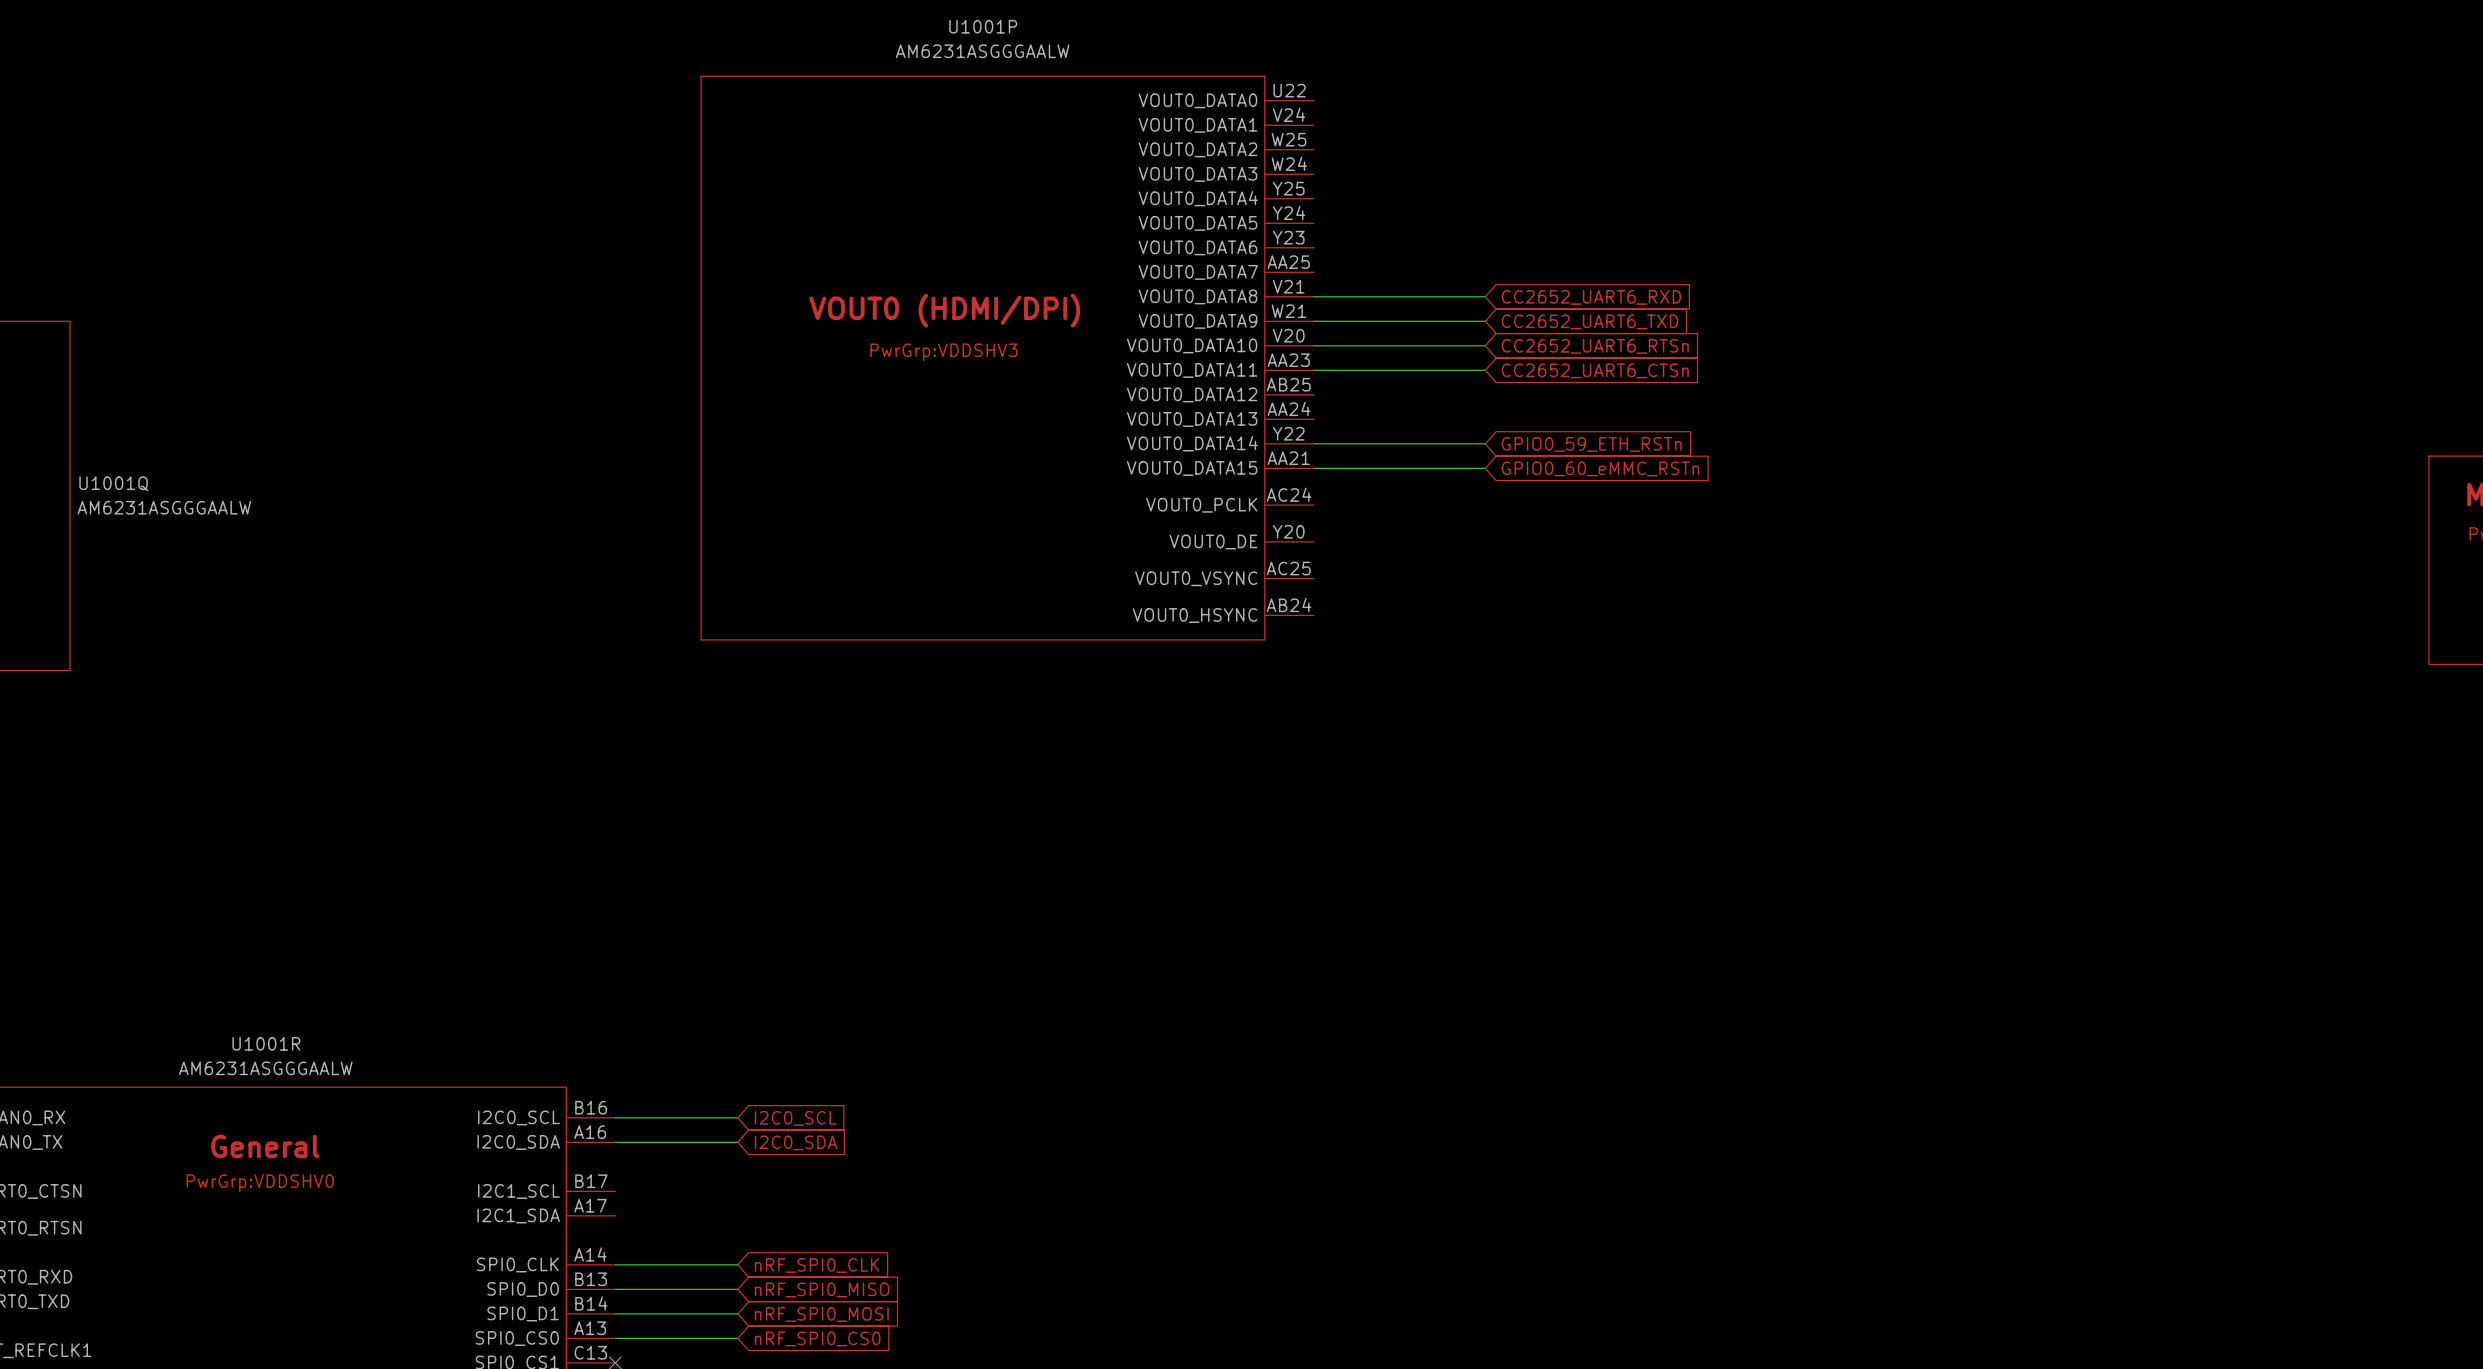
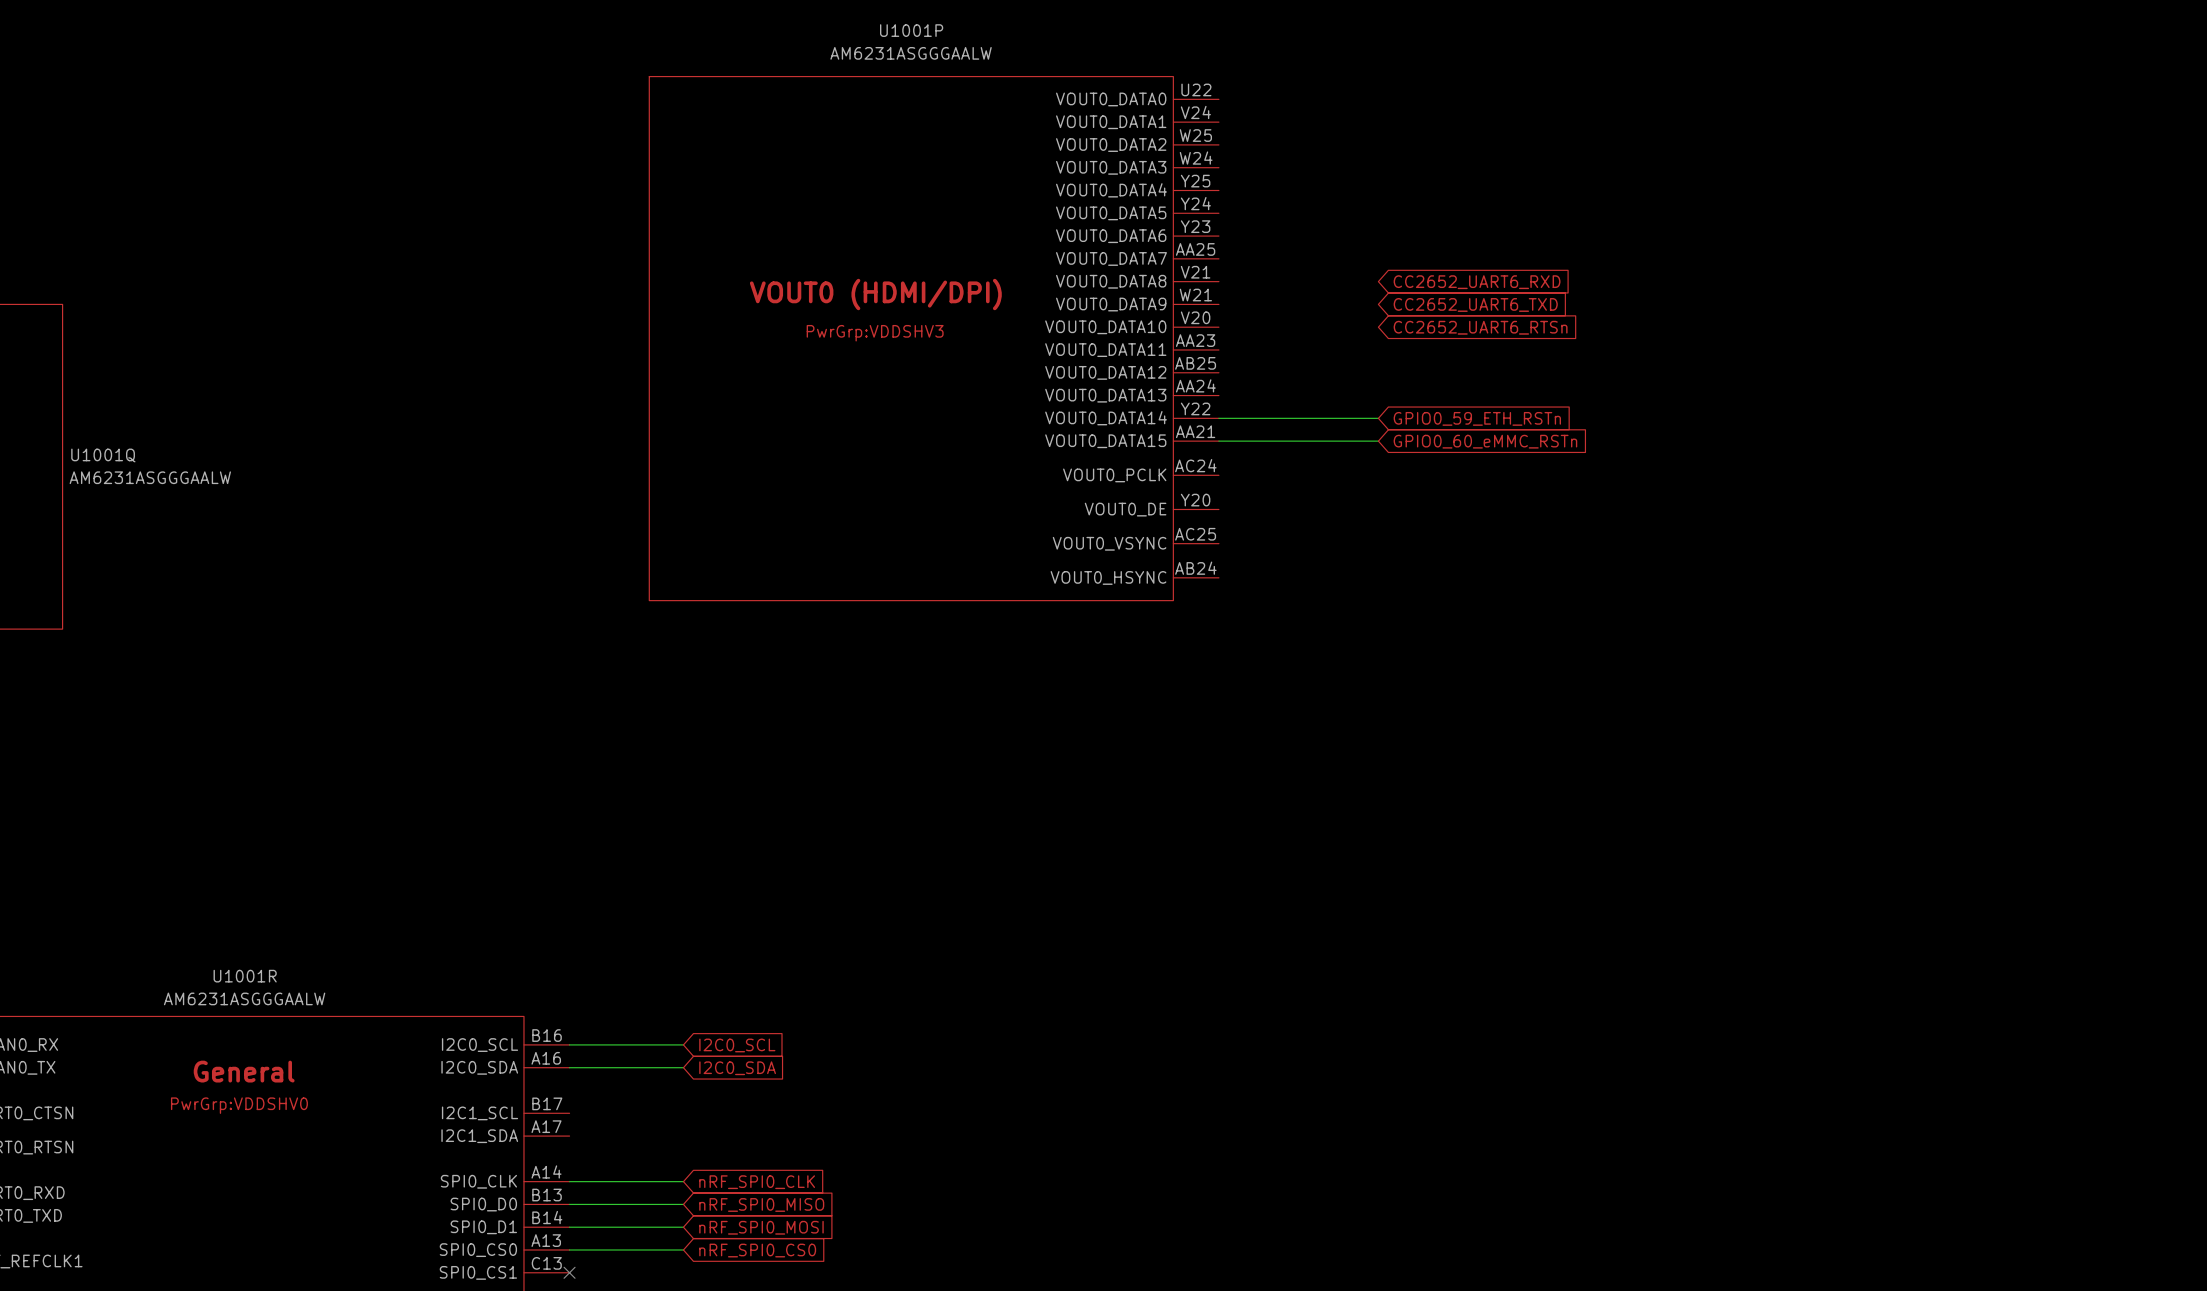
wire: (1313, 296) (1485, 296) -> none
wire: (1313, 321) (1485, 321) -> none
wire: (1313, 345) (1485, 345) -> none
wire: (1313, 370) (1485, 370) -> none
global label: CC2652_UART6_CTSn (1595, 370) -> none

